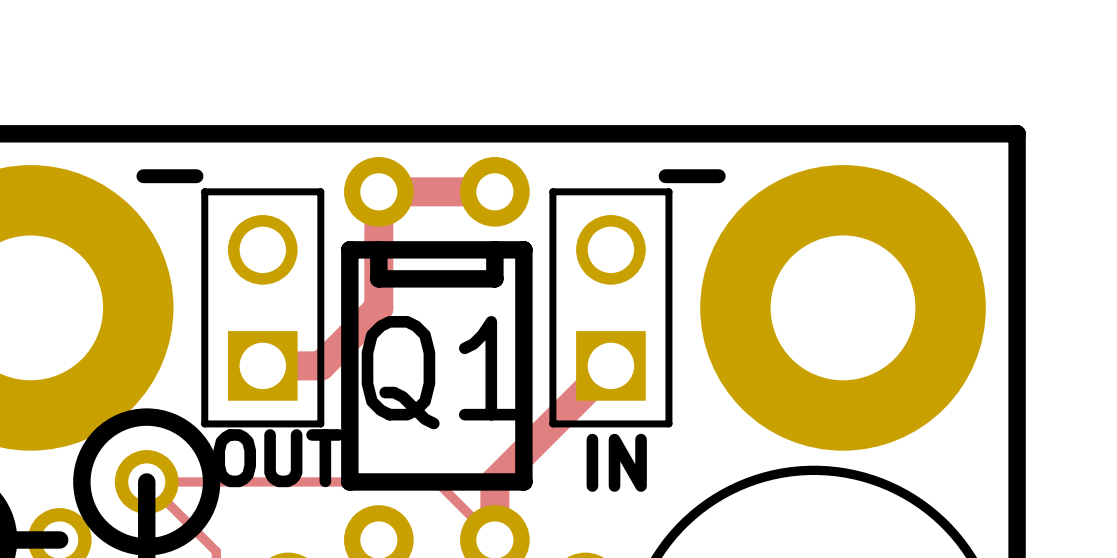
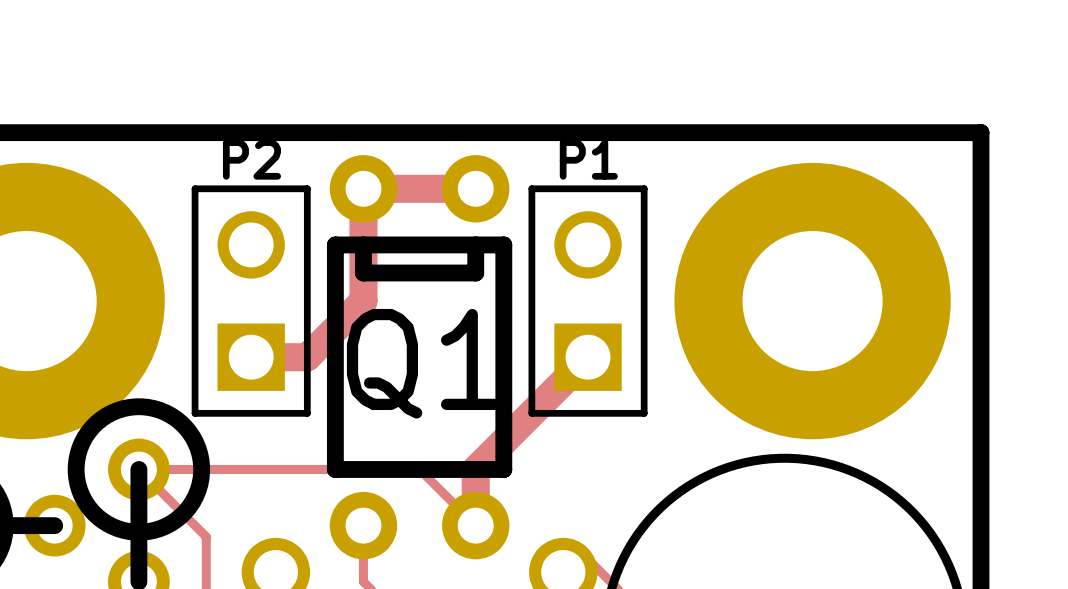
P2 name: none -> P2 (251, 159)
P1 name: none -> P1 (588, 159)
text: - (169, 176) -> none
text: - (692, 176) -> none
text: OUT (278, 458) -> none
text: IN (616, 462) -> none

